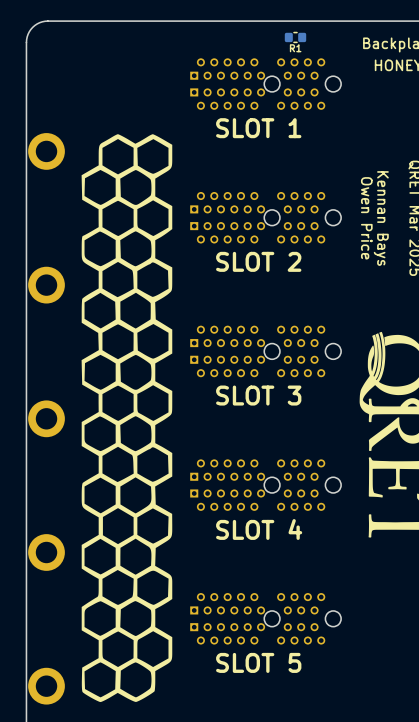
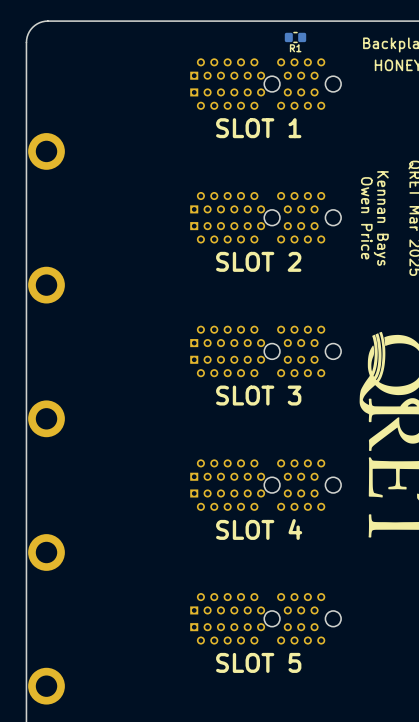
drawing: [81, 134, 173, 703] -> none

